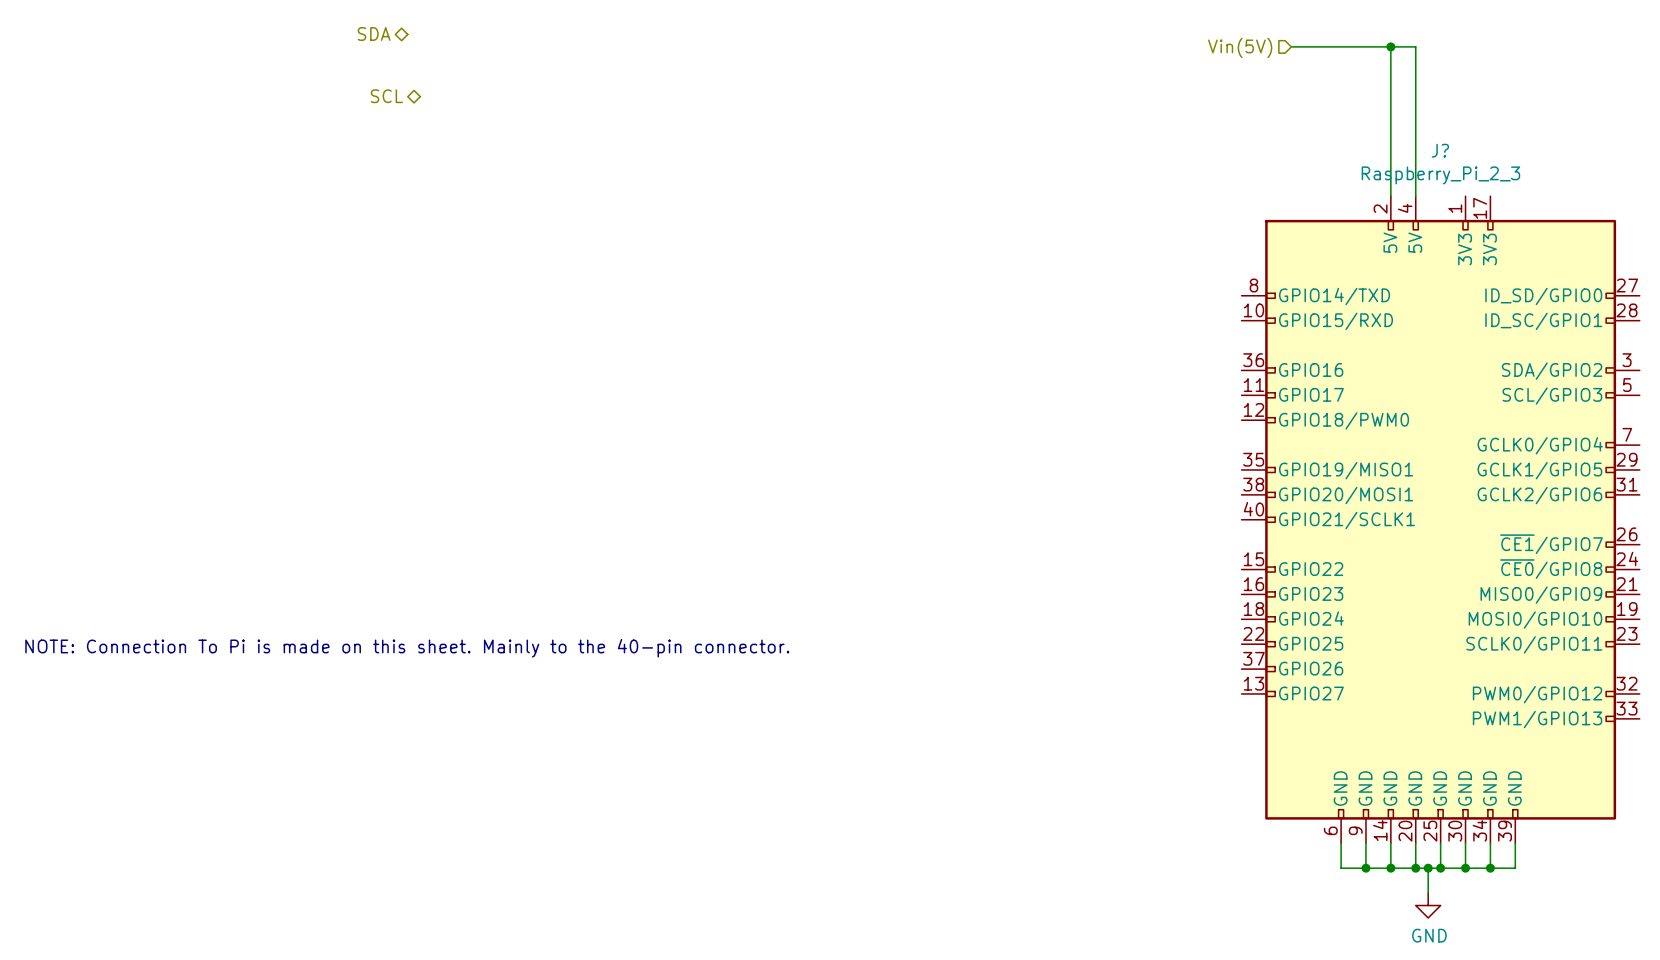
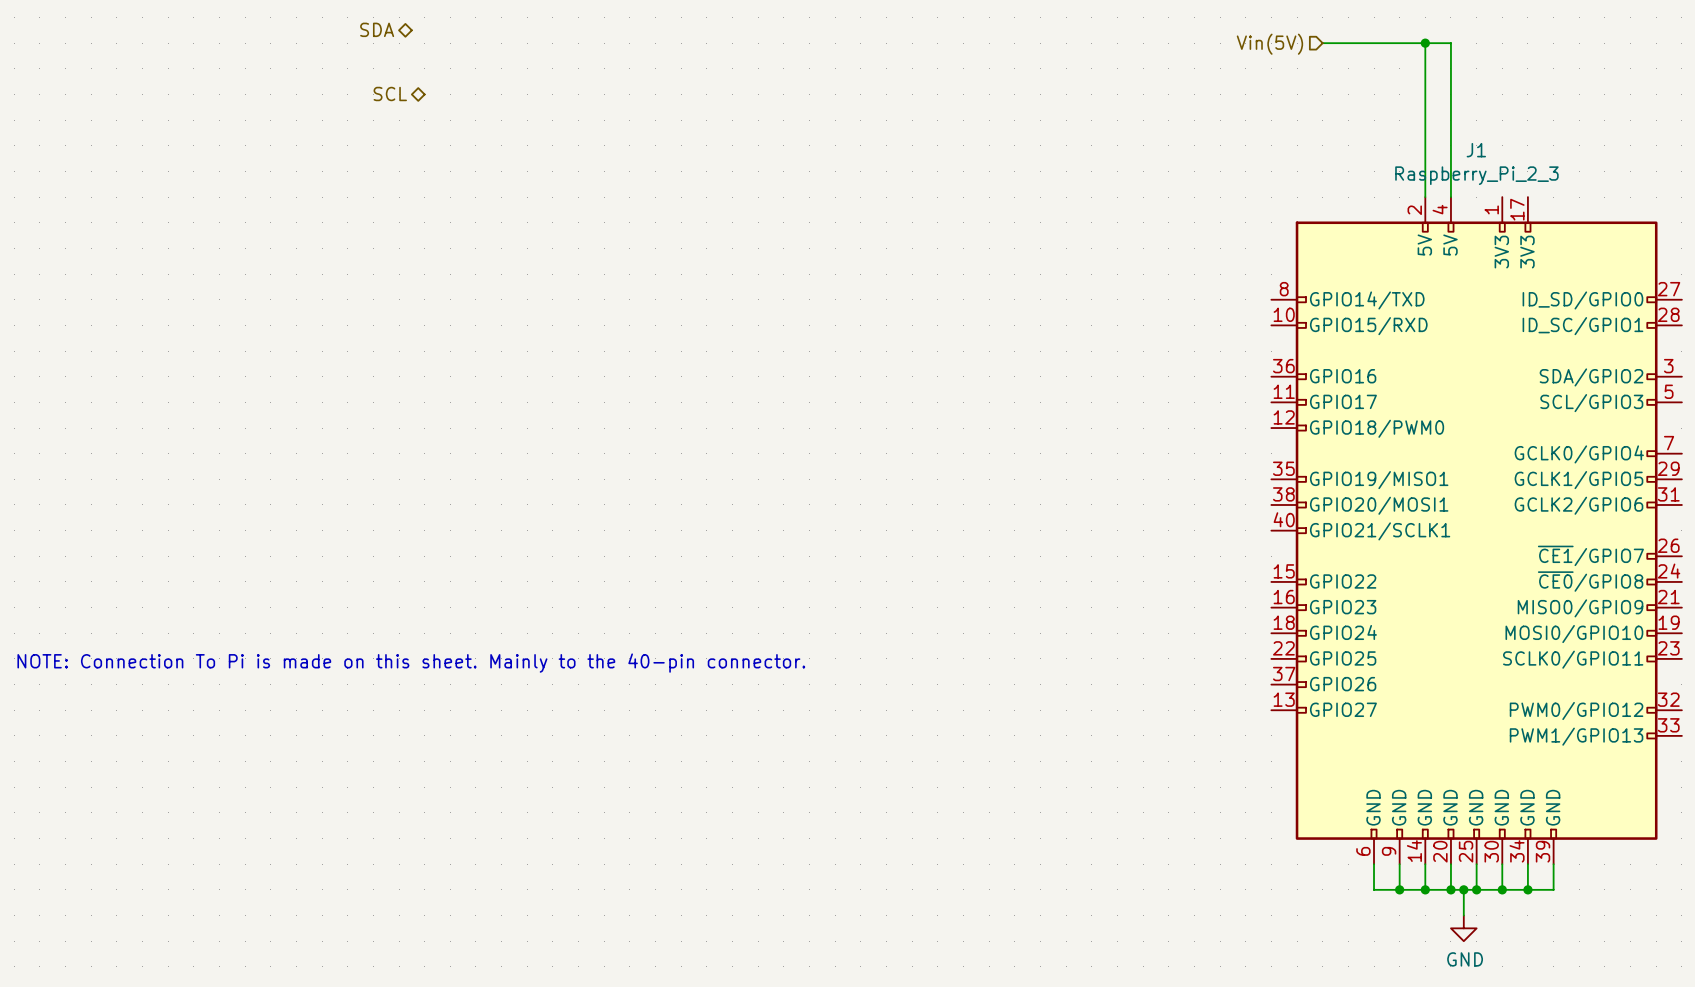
J? name: J? (1440, 150) -> J1 (1476, 150)

